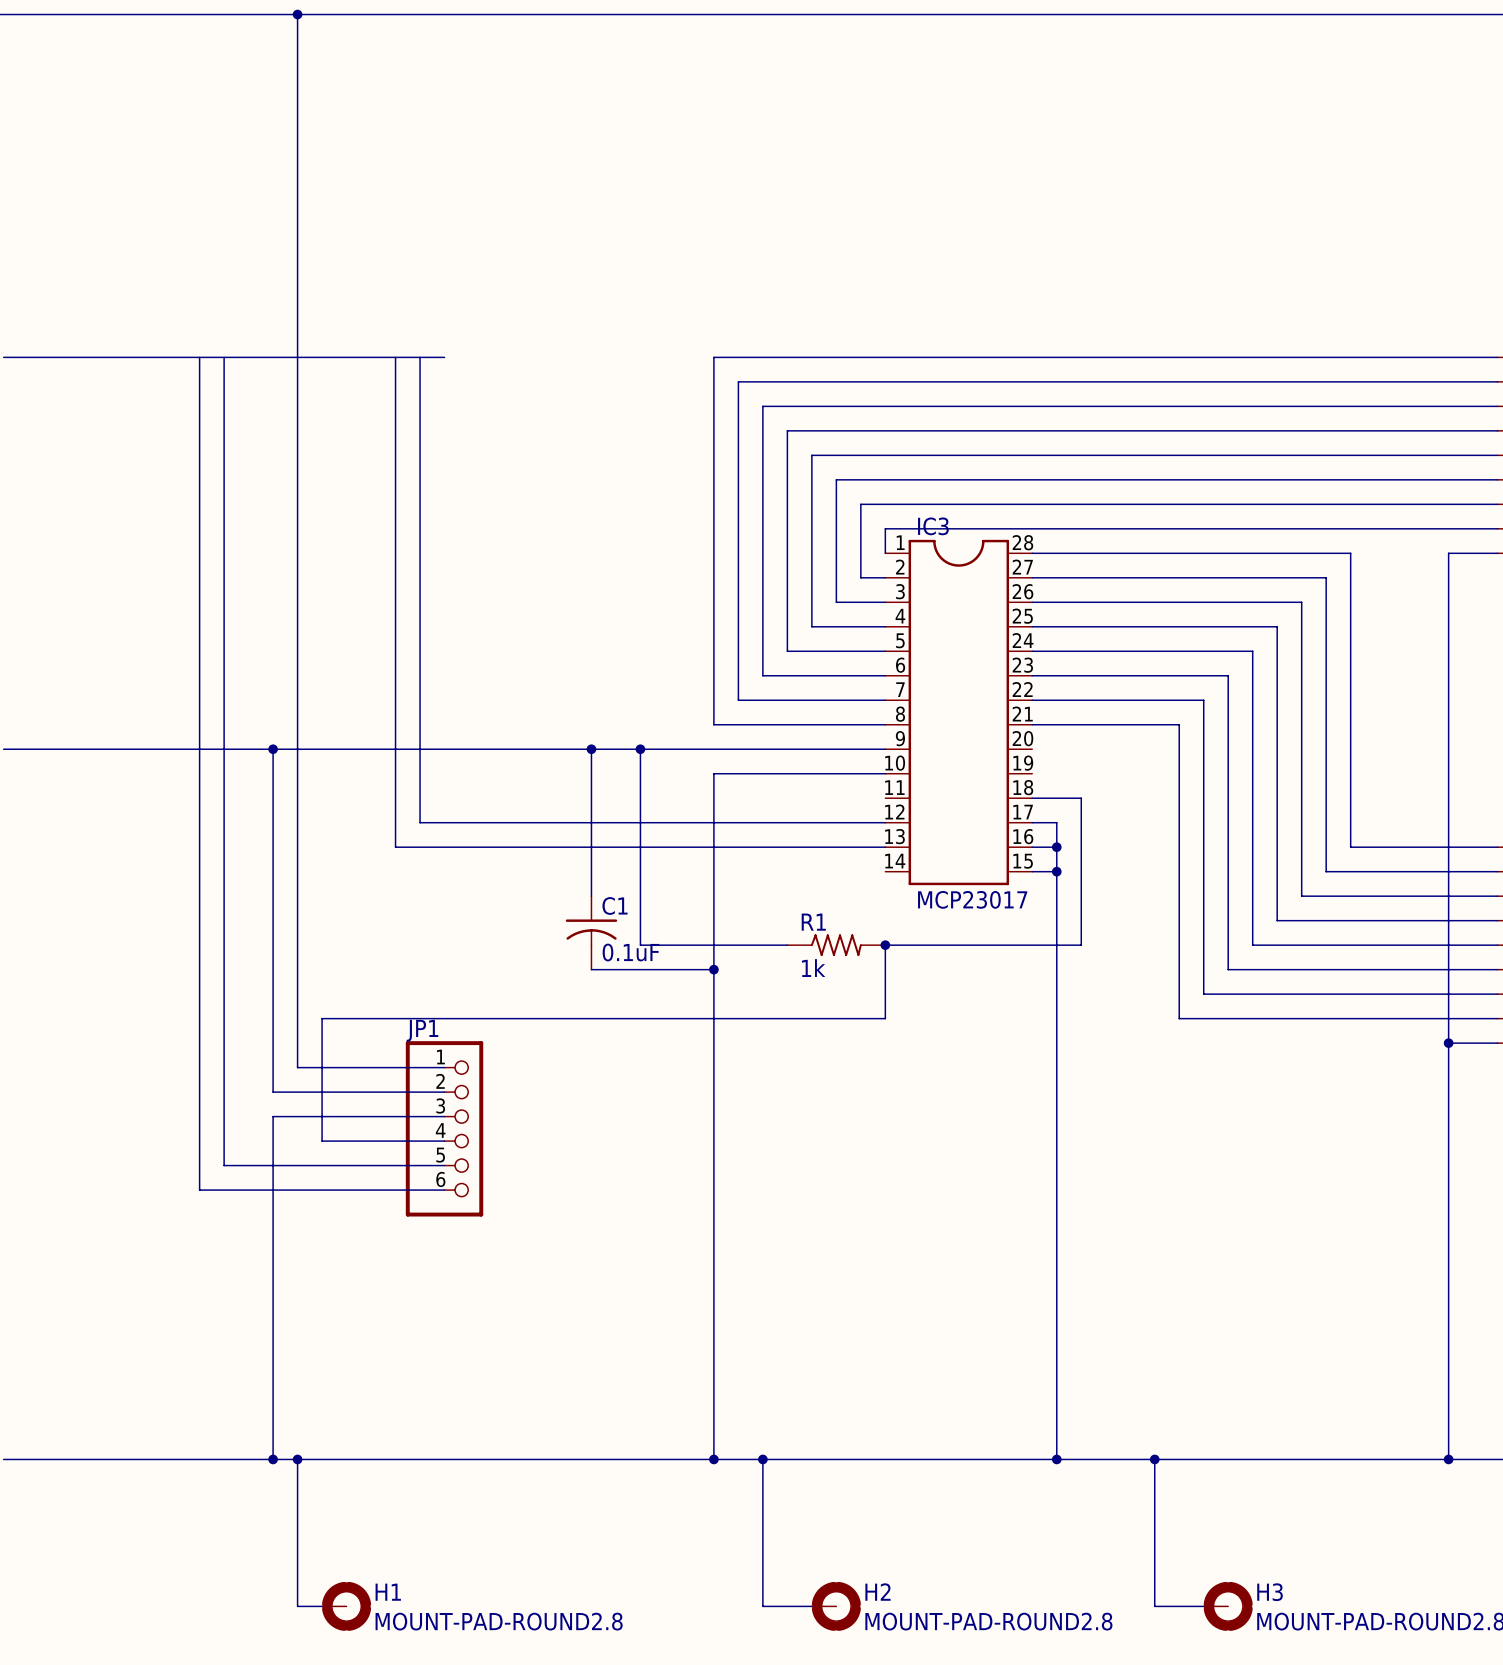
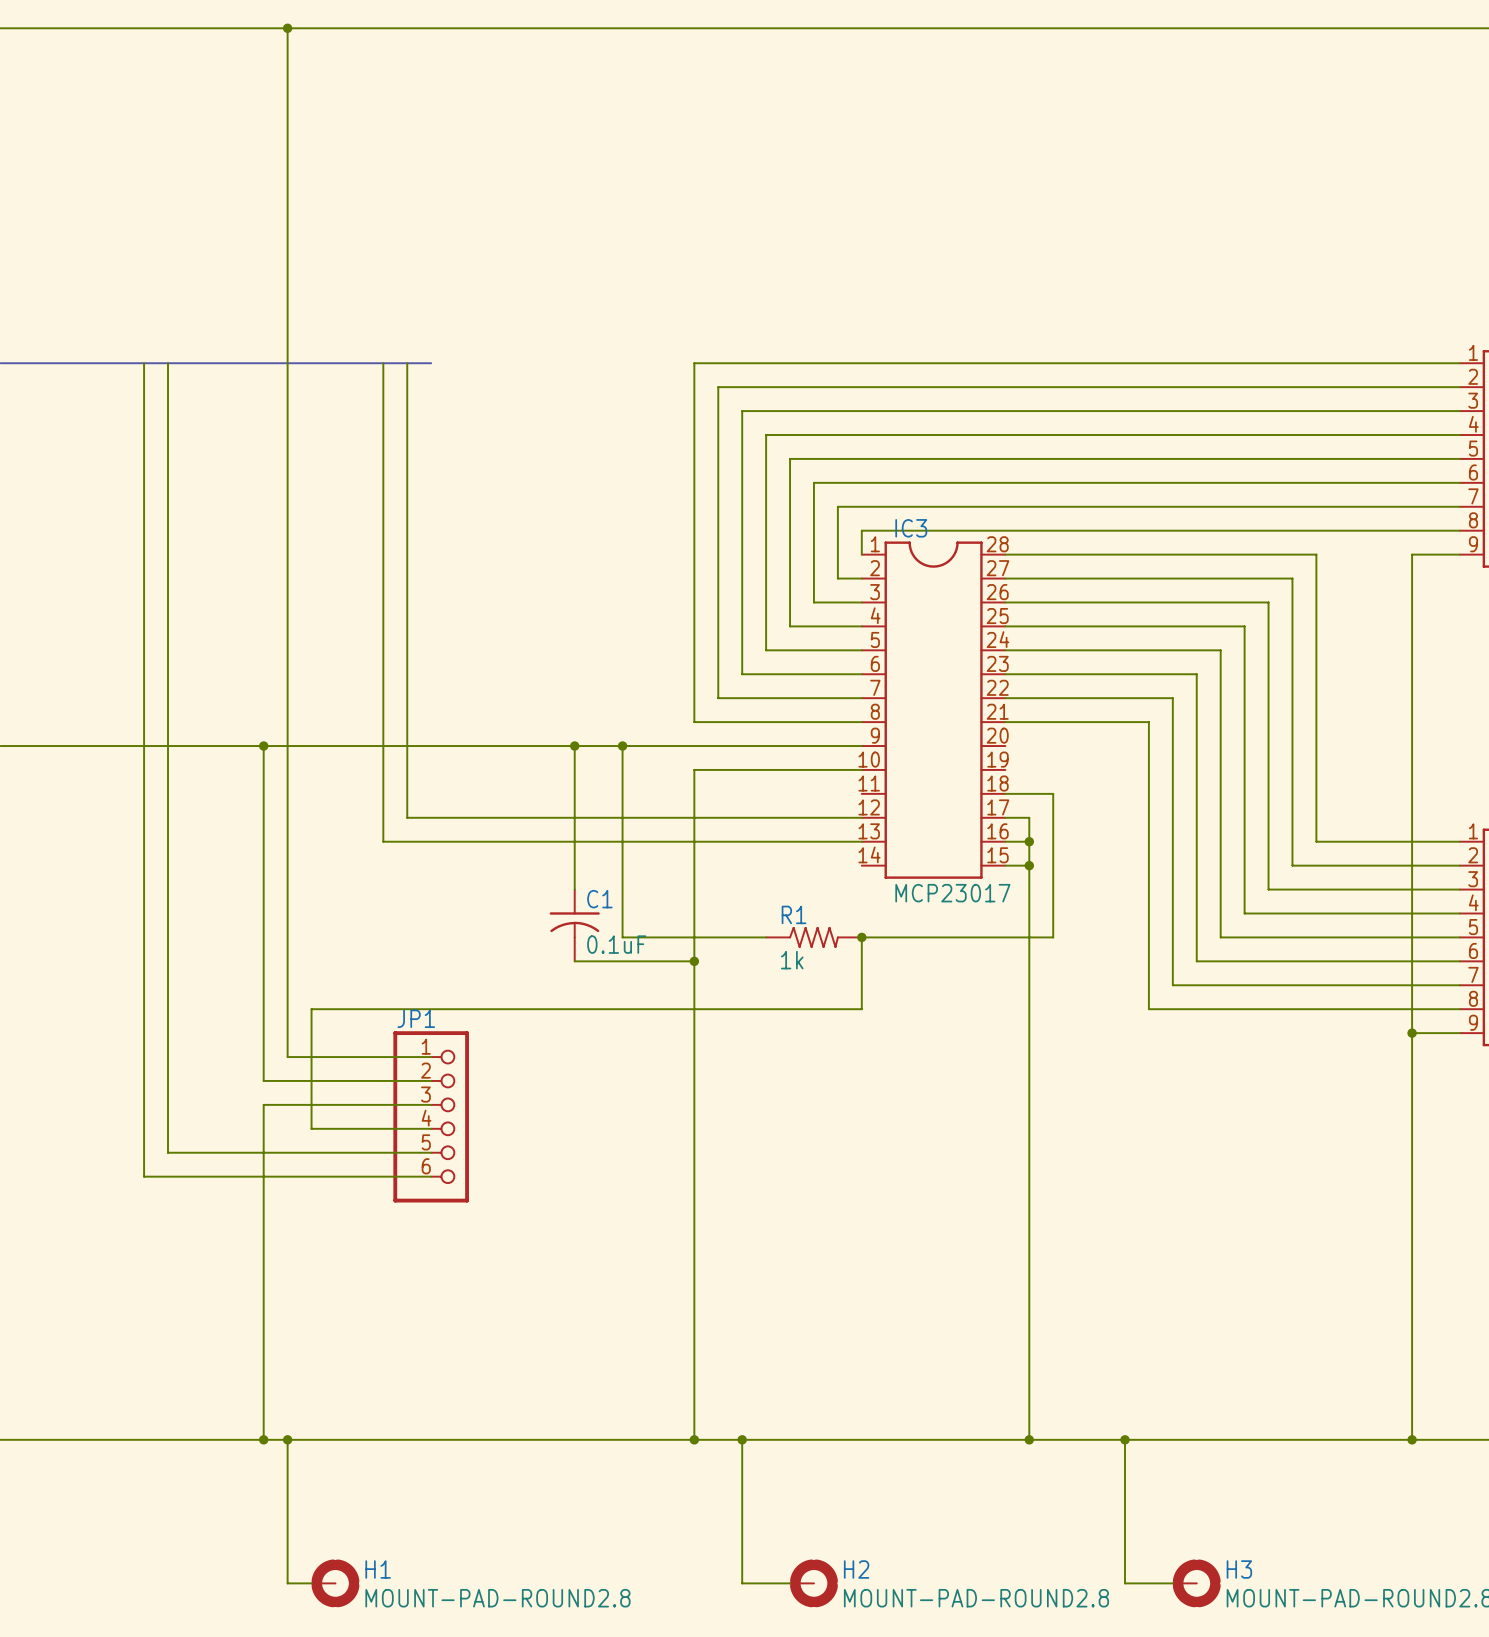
wire: (199, 357) (199, 1190) -> (144, 363) (144, 1176) (191, 1176)
wire: (224, 357) (224, 1165) -> (168, 363) (168, 1152) (215, 1152)

